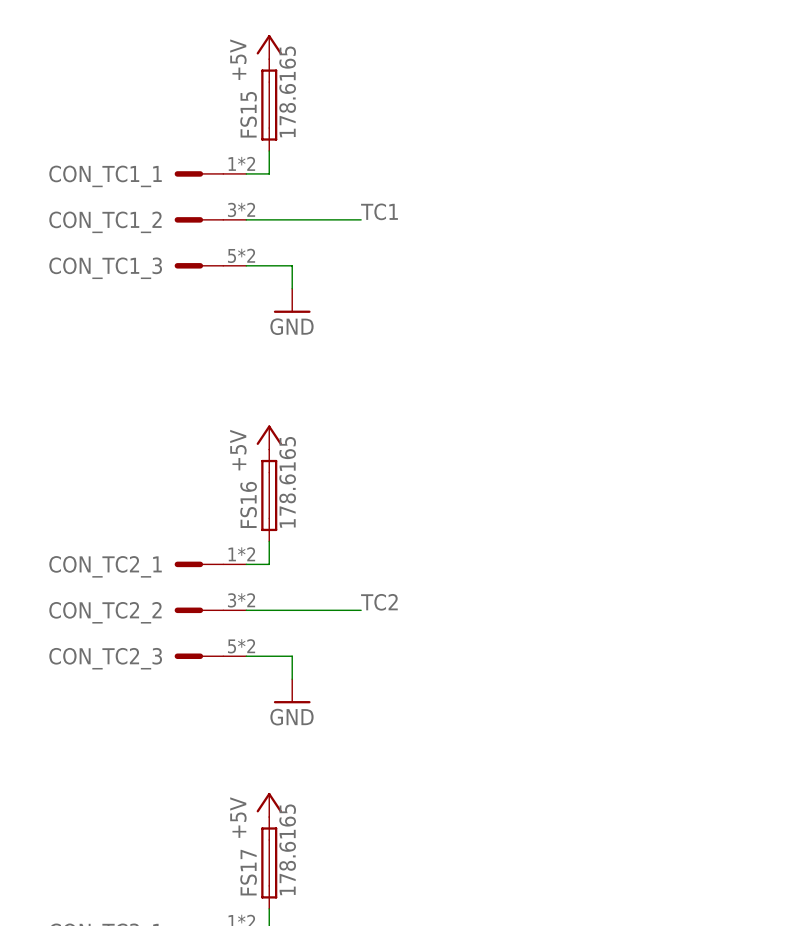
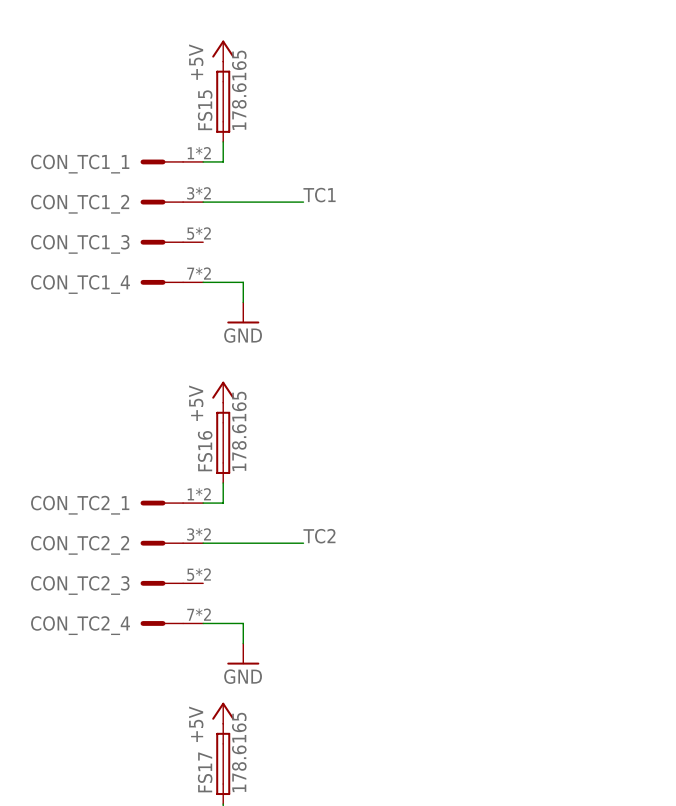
wire: (246, 265) (292, 265) (292, 288) -> (203, 282) (243, 282) (243, 302)
power symbol position: GND (292, 300) -> GND (243, 312)
CON_TC1_4: none -> (171, 282)
wire: (246, 656) (292, 656) (292, 679) -> (203, 623) (243, 623) (243, 643)
power symbol position: GND (292, 691) -> GND (243, 654)
CON_TC2_4: none -> (171, 623)

